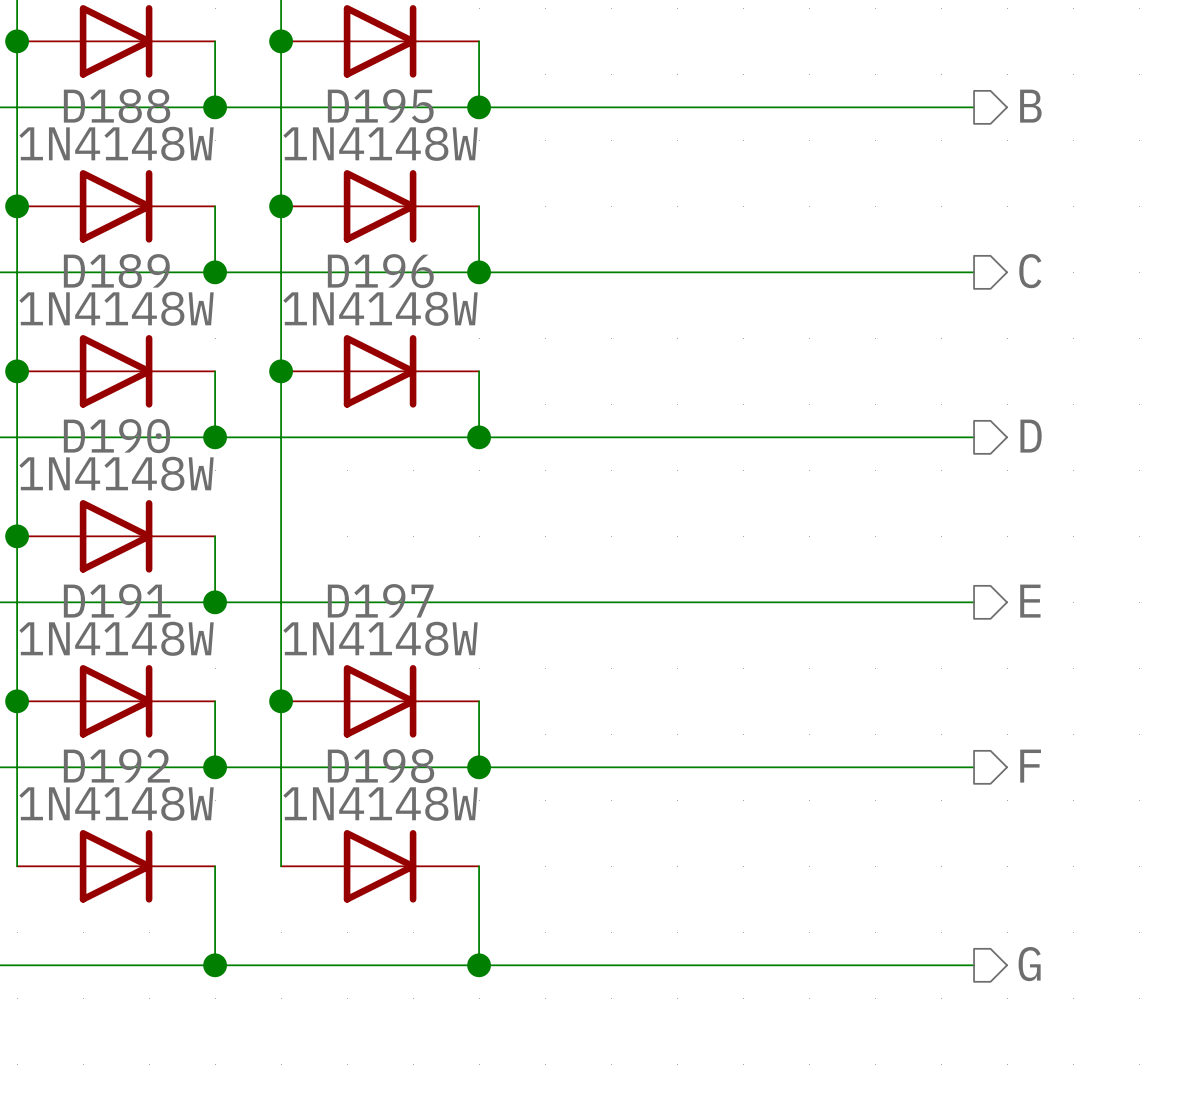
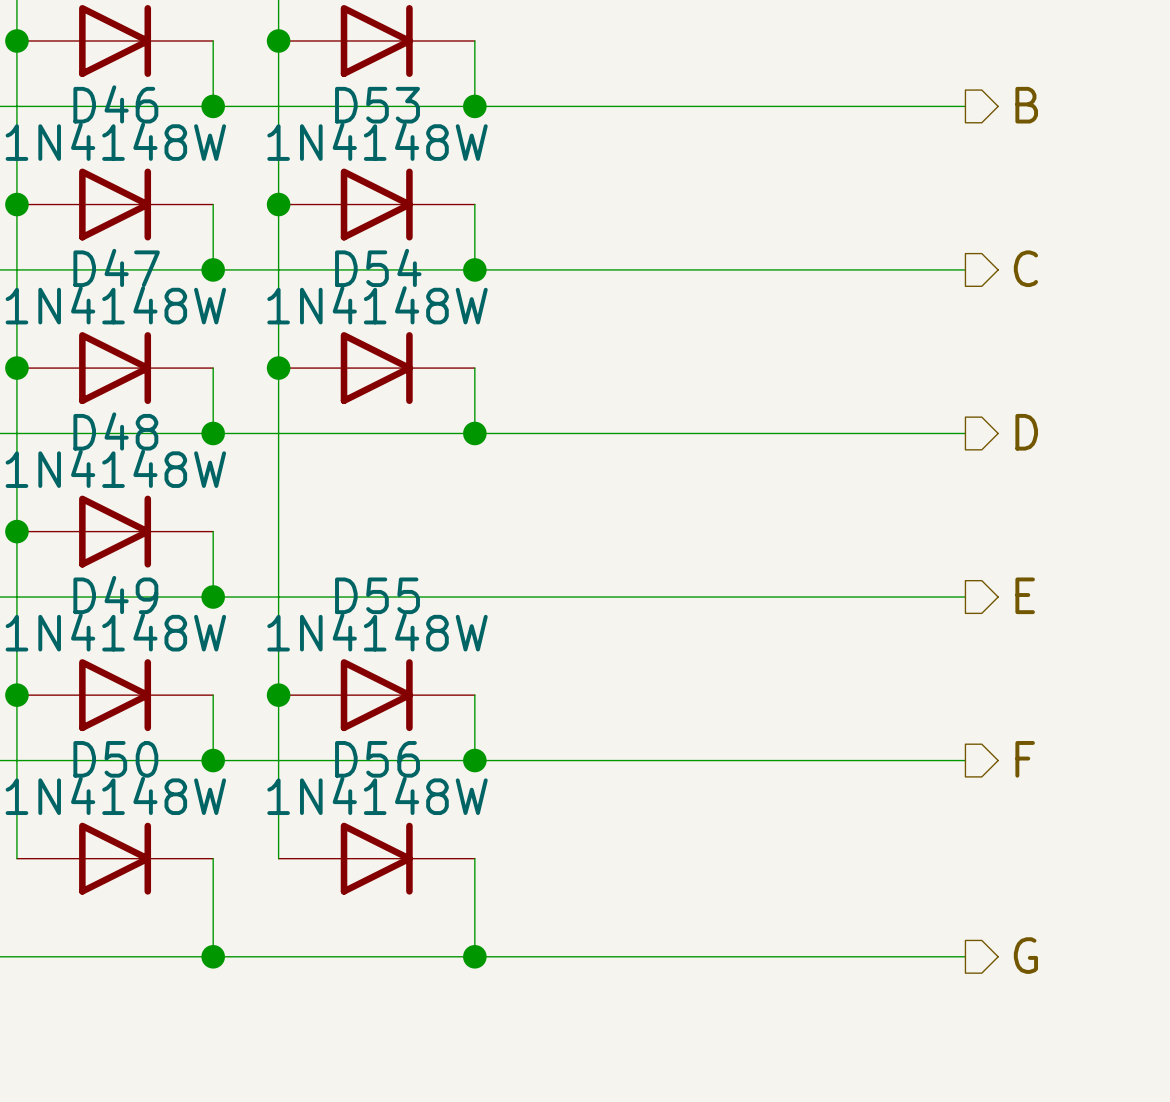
D188 name: D188 (117, 106) -> D46 (115, 104)
D195 name: D195 (380, 106) -> D53 (377, 105)
D189 name: D189 (116, 271) -> D47 (116, 267)
D196 name: D196 (380, 271) -> D54 (378, 267)
D190 name: D190 (117, 436) -> D48 (115, 431)
D191 name: D191 (117, 600) -> D49 (115, 595)
D197 name: D197 (380, 600) -> D55 (377, 595)
D192 name: D192 (116, 765) -> D50 (115, 759)
D198 name: D198 (381, 766) -> D56 (377, 759)

